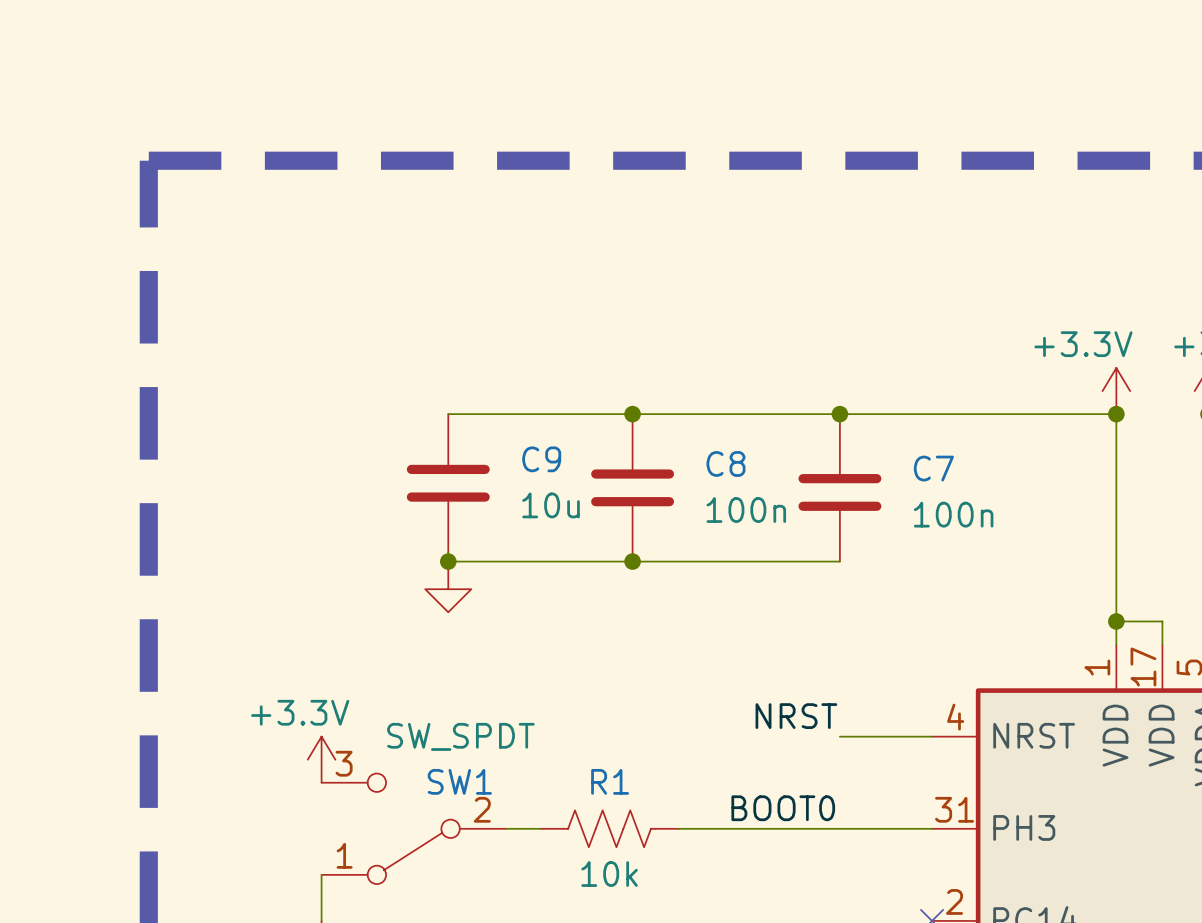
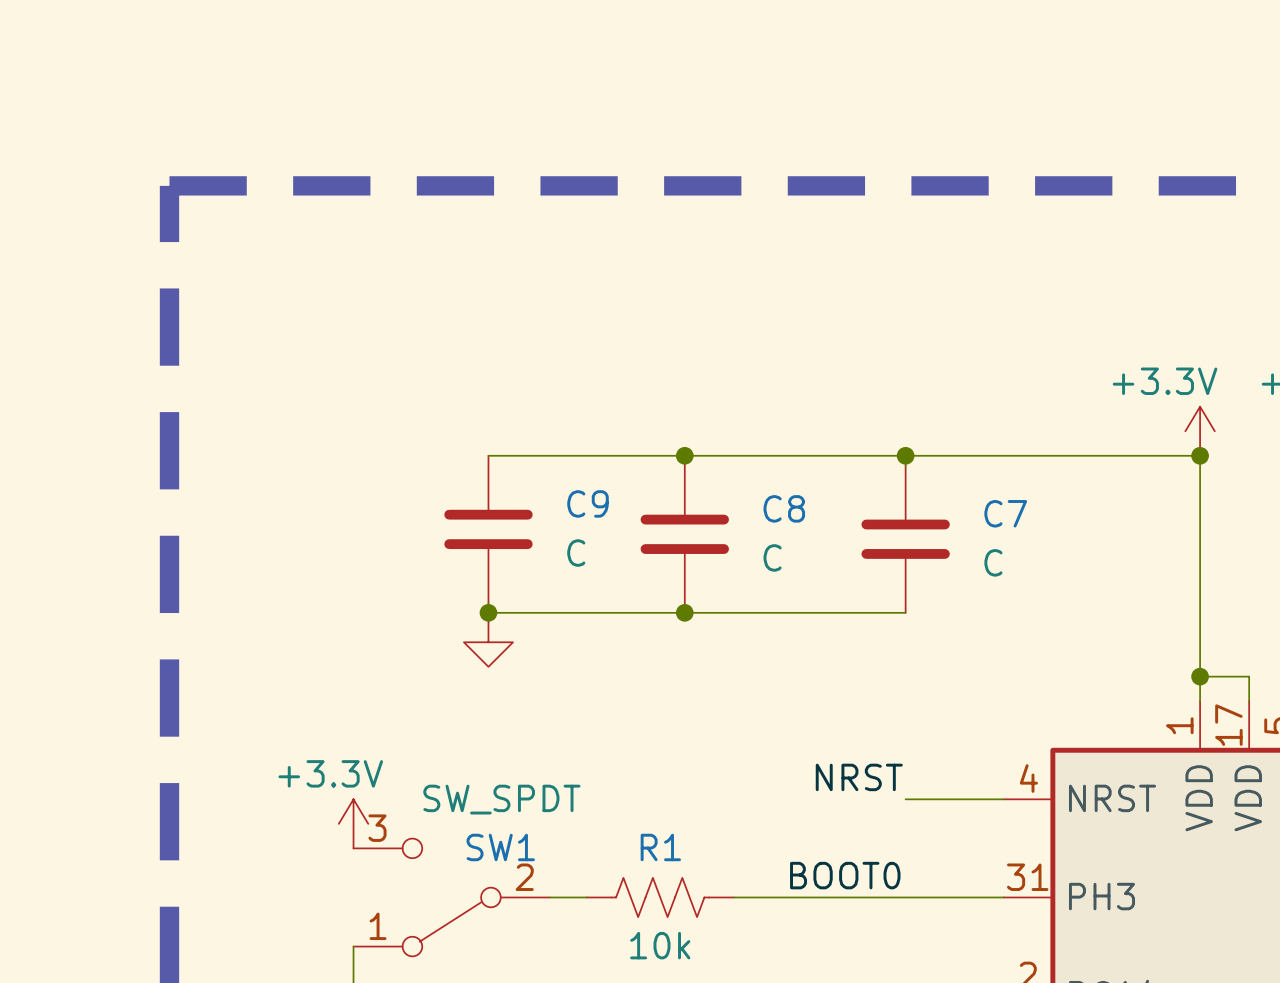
C9 value: 10u (551, 505) -> C (576, 553)
C8 value: 100n (746, 510) -> C (772, 557)
C7 value: 100n (953, 514) -> C (993, 562)

